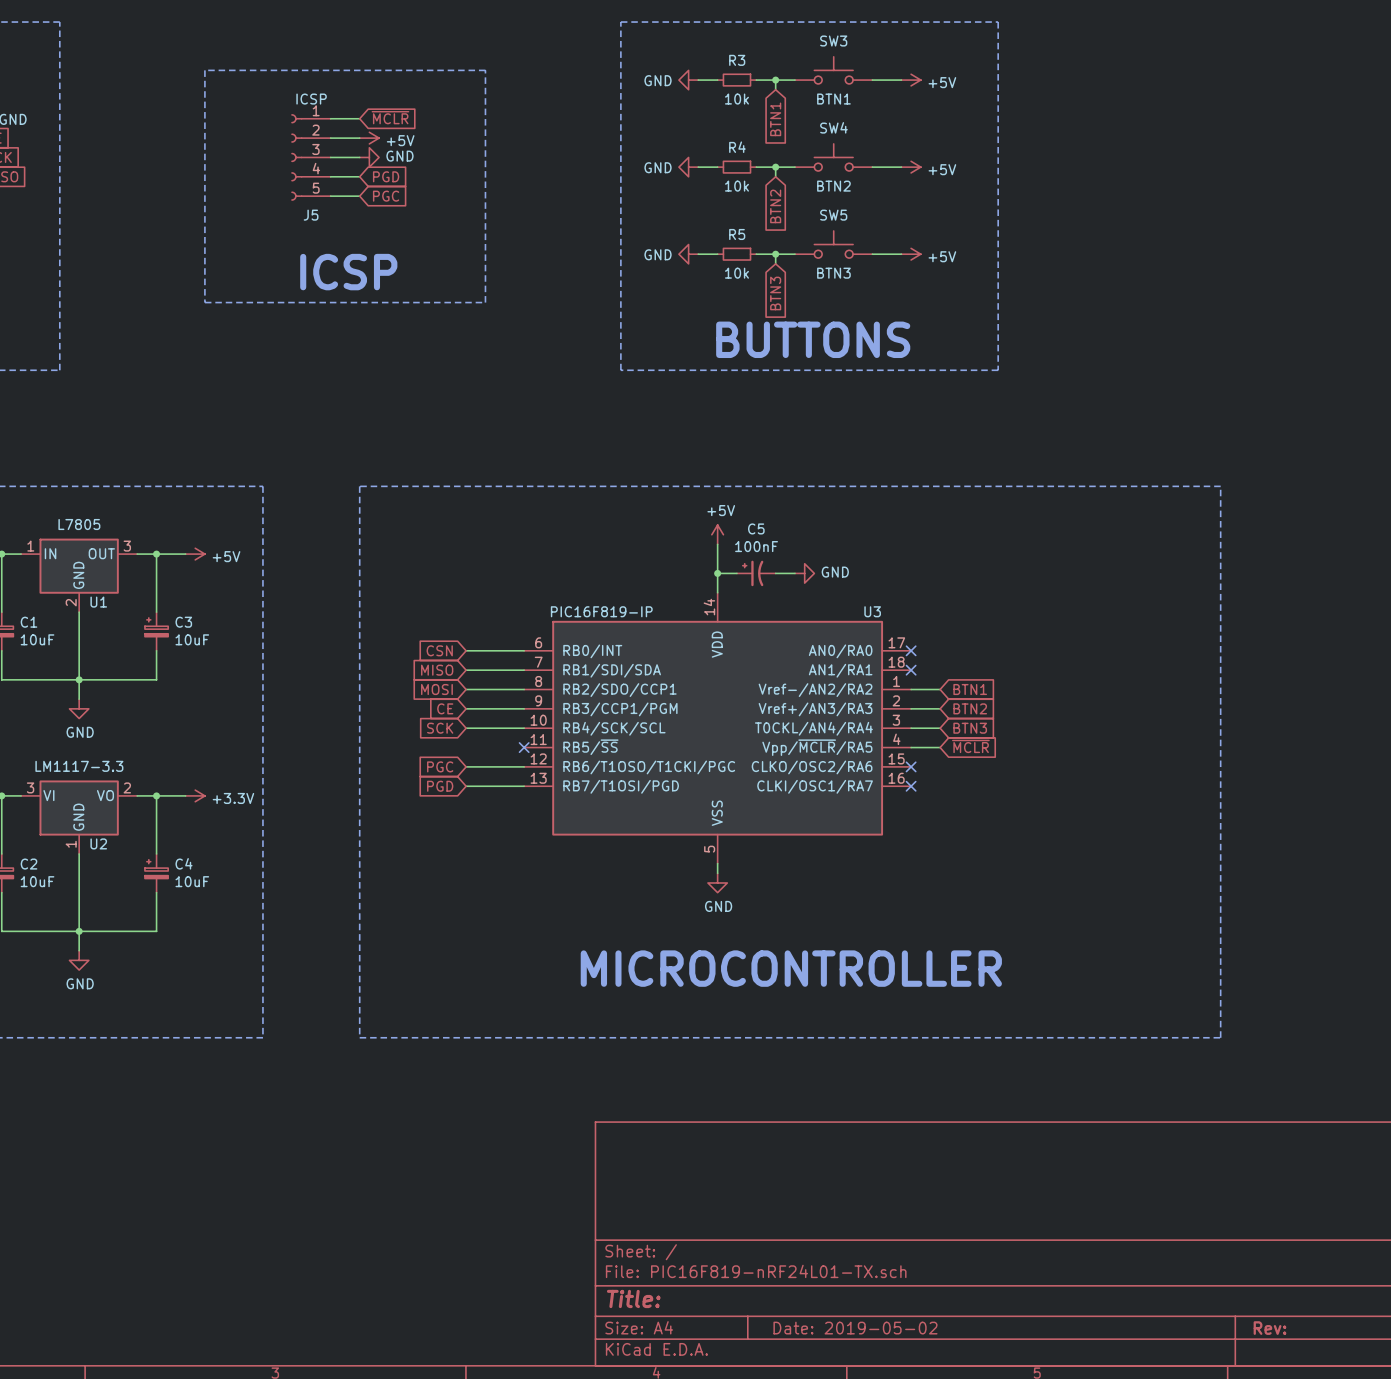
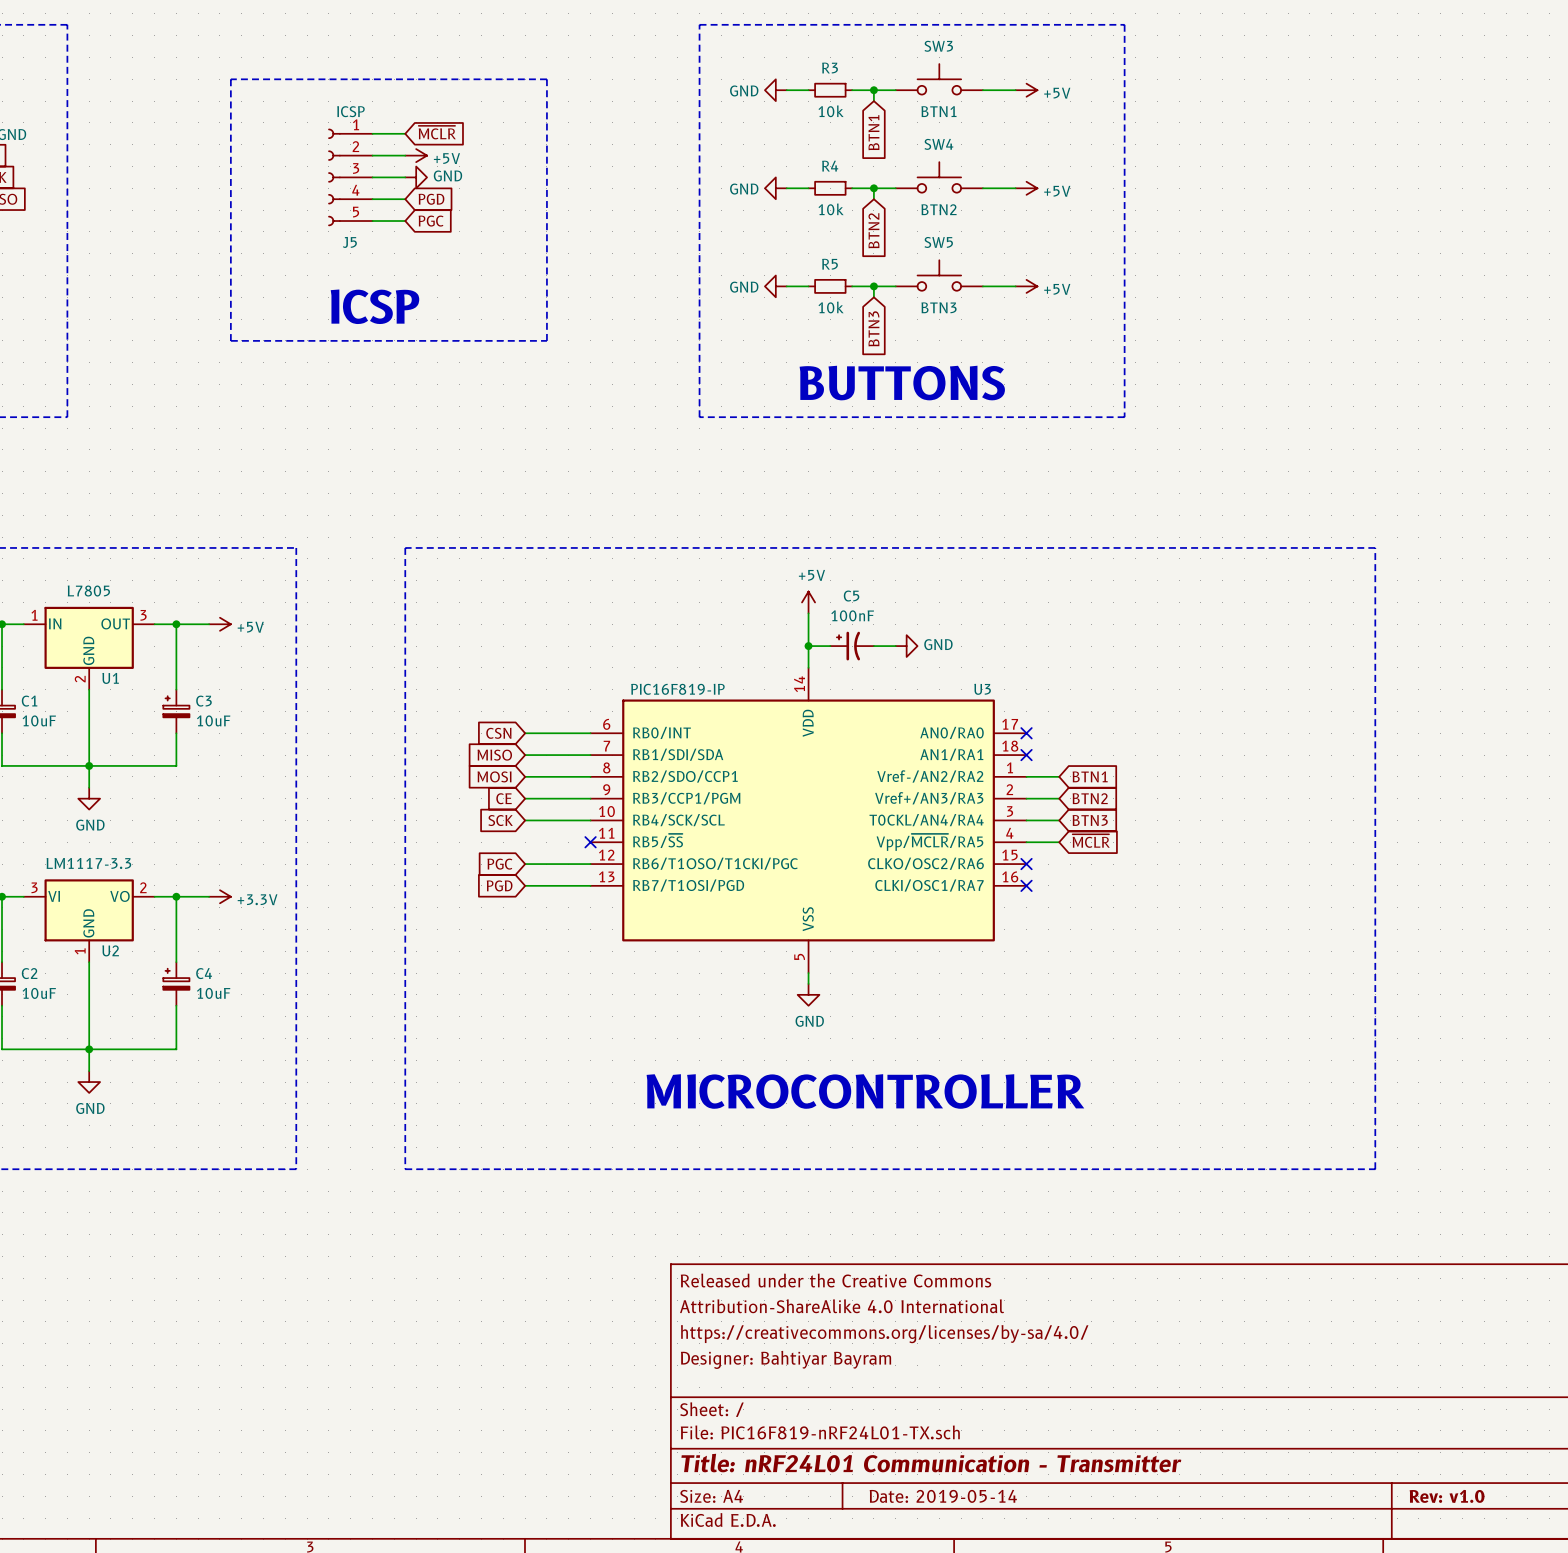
title block: none -> Released under the Creative Commons (835, 1280)
title block: none -> Attribution-ShareAlike 4.0 International (842, 1306)
title block: none -> https://creativecommons.org/licenses/by-sa/4.0/ (884, 1334)
title block: none -> Designer: Bahtiyar Bayram (786, 1359)
title block: Title: (633, 1298) -> Title: nRF24L01 Communication - Transmitter (931, 1463)
title block: Date: 2019-05-02 (855, 1328) -> Date: 2019-05-14 (943, 1496)
title block: Rev: (1270, 1328) -> Rev: v1.0 (1447, 1496)

